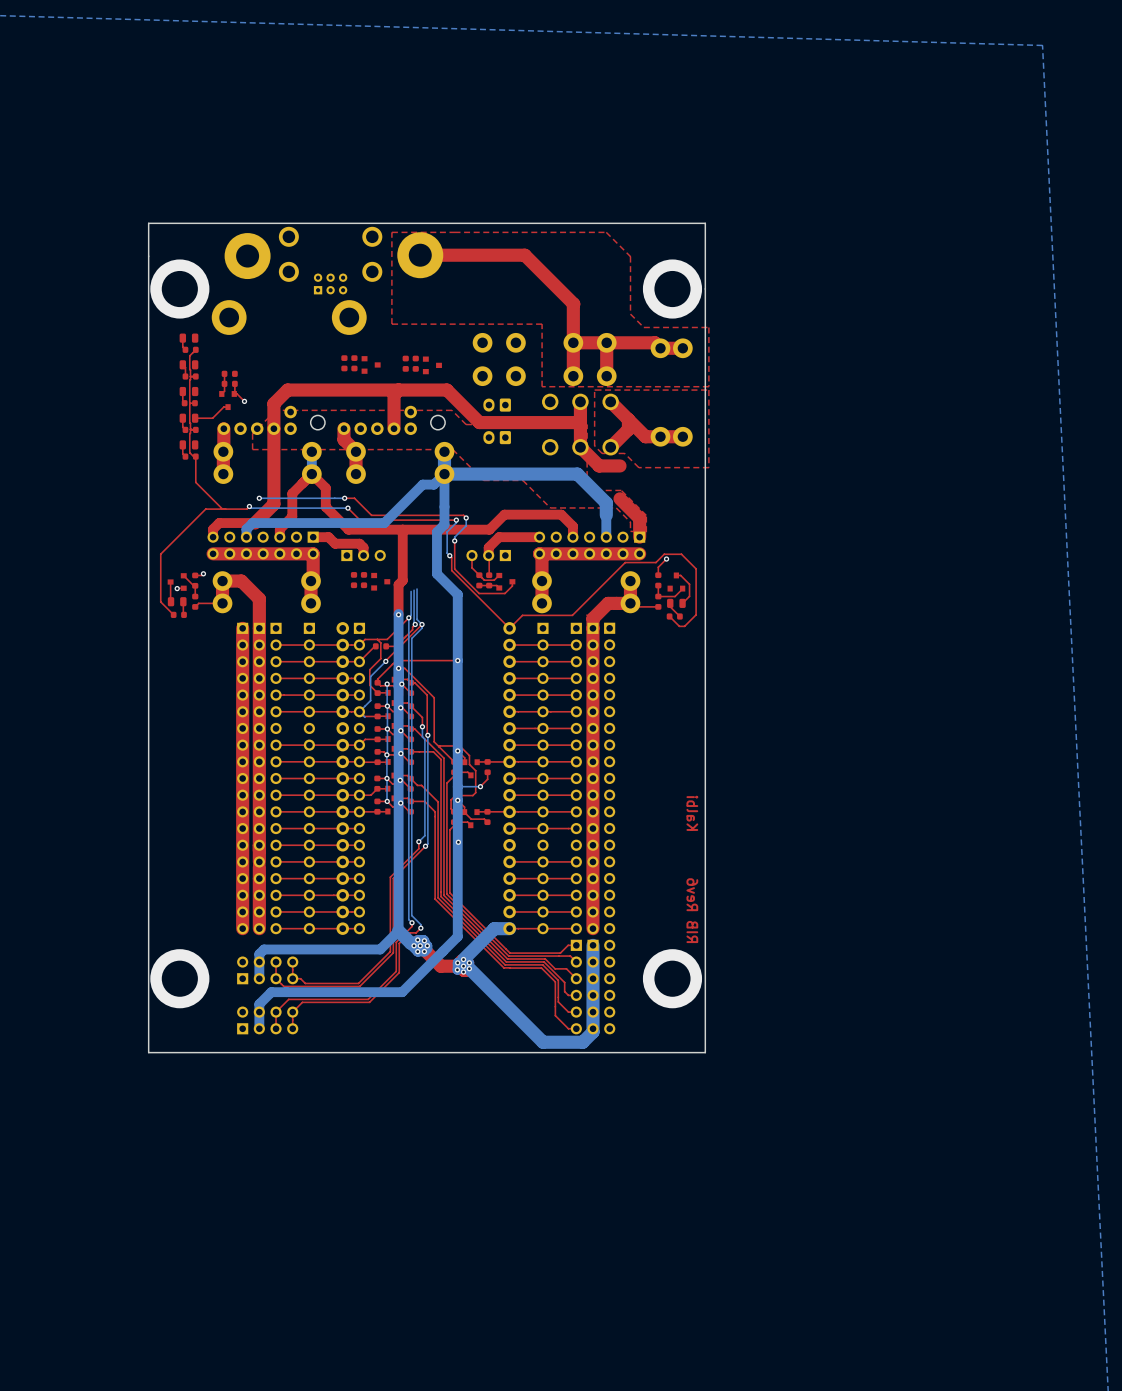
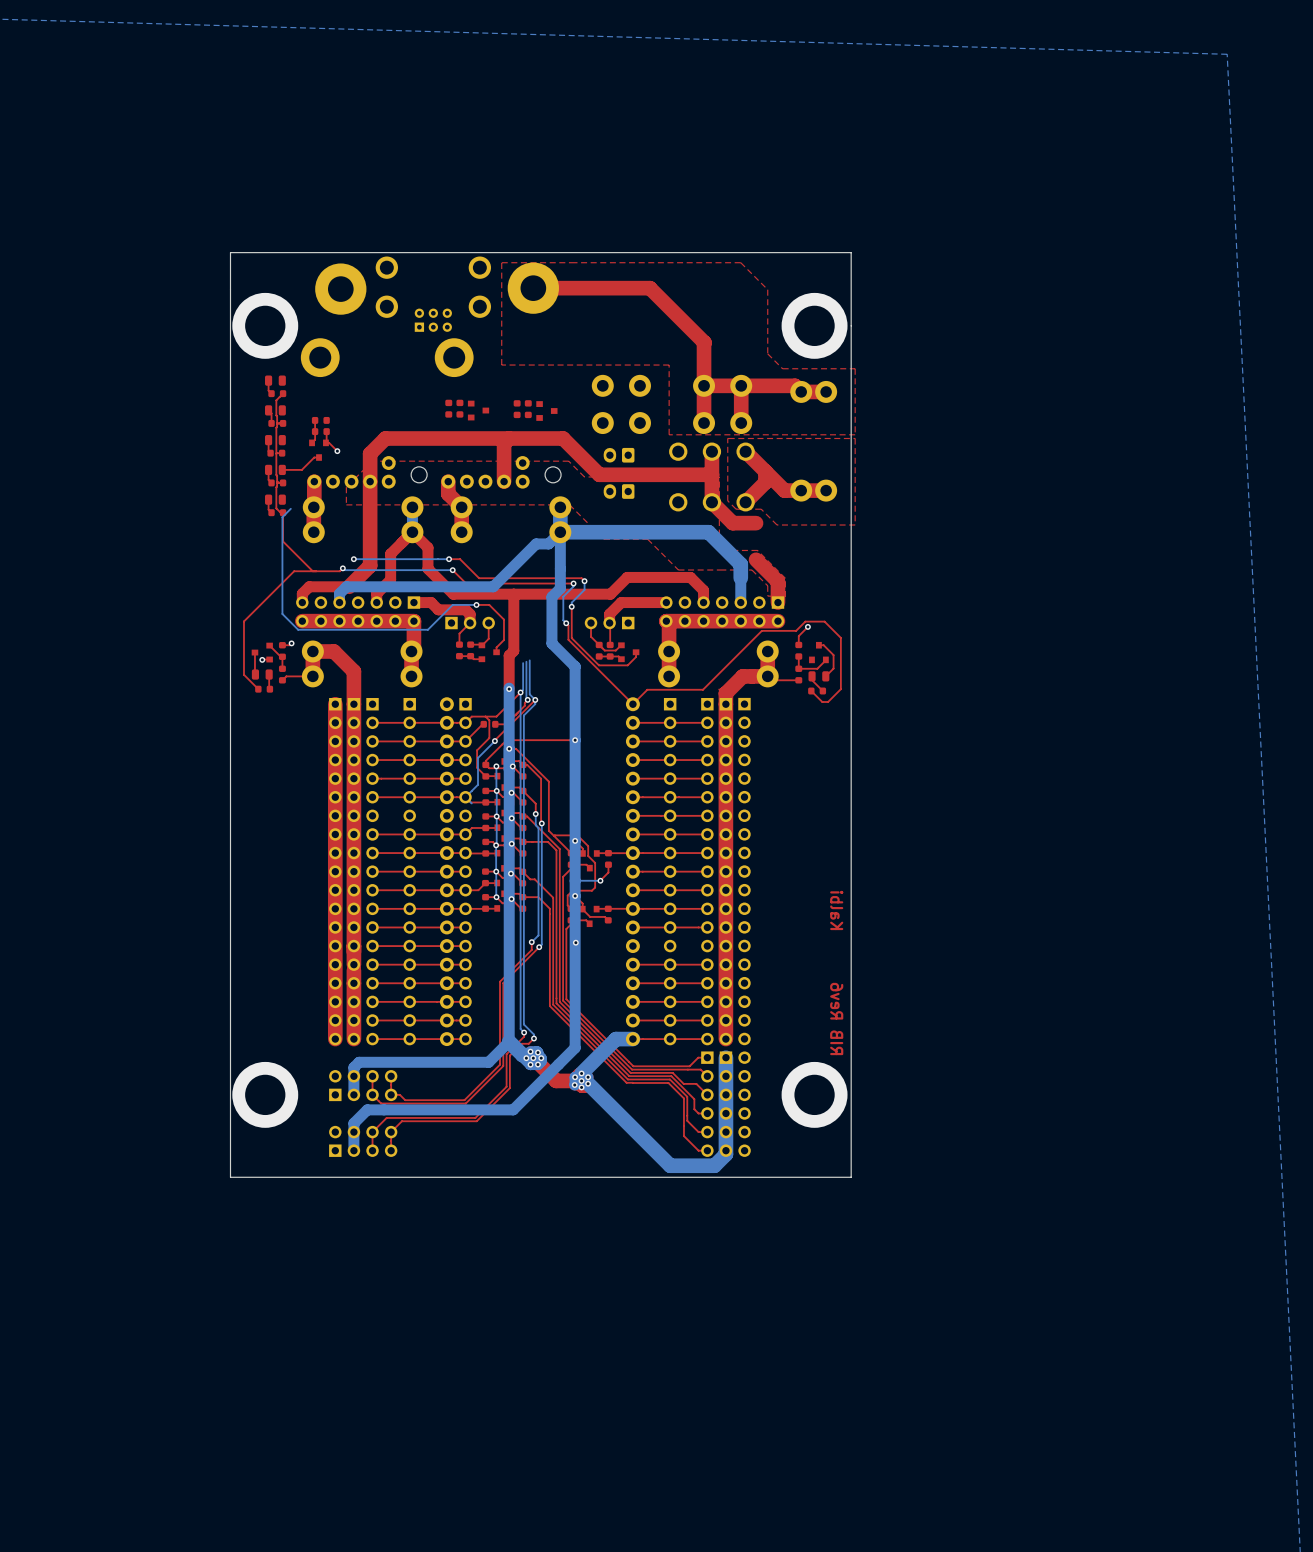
bottom track: none -> (290, 508) (282, 517) (282, 614) (298, 629) (427, 629) (452, 604) (476, 604)
top track: none -> (476, 604) (489, 604) (503, 619) (503, 640) (496, 647) (496, 652)
via: none -> (476, 604)
top track: none -> (470, 623) (459, 633) (459, 644)
top track: none -> (488, 623) (488, 638) (482, 645) (470, 644)
top track: none -> (459, 656) (470, 656) (473, 659) (481, 659)

